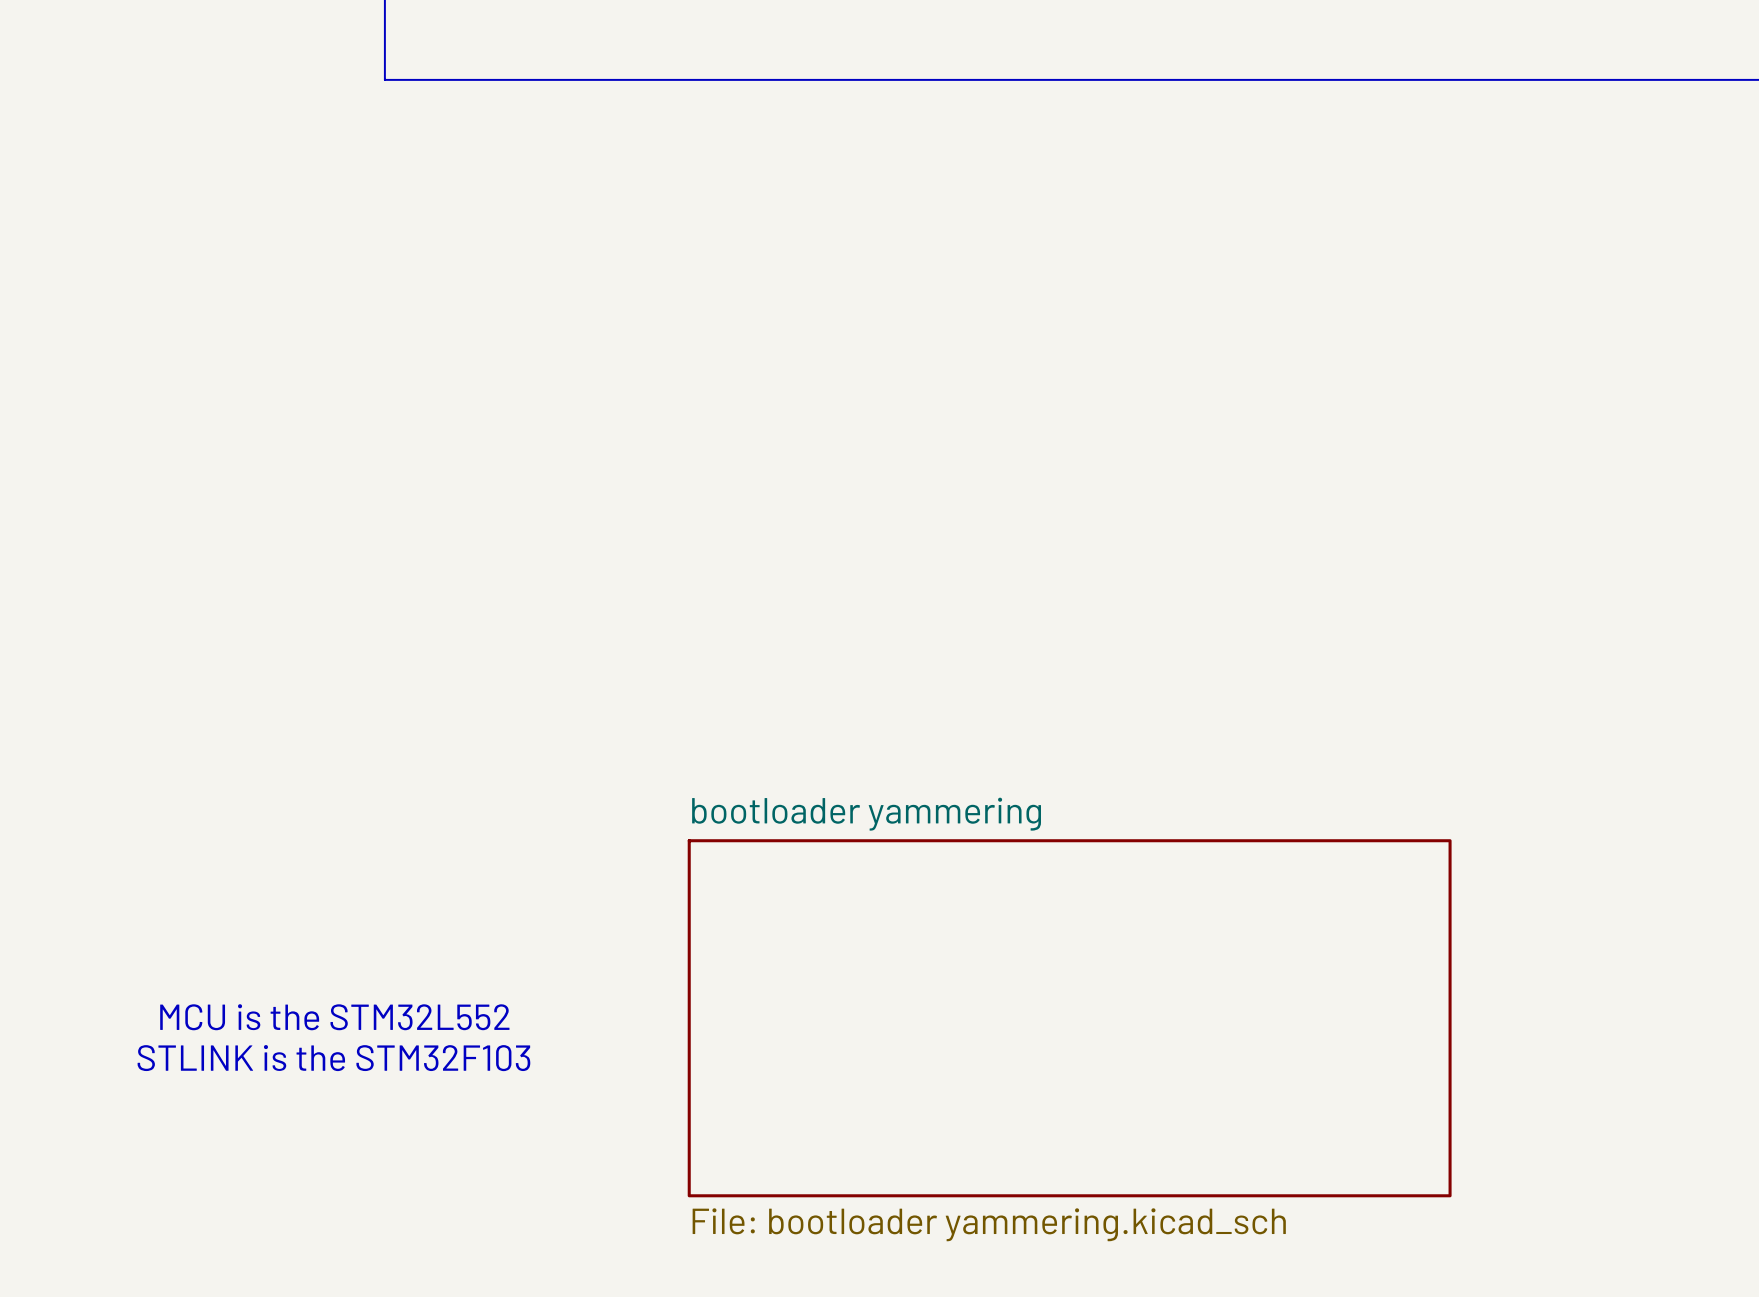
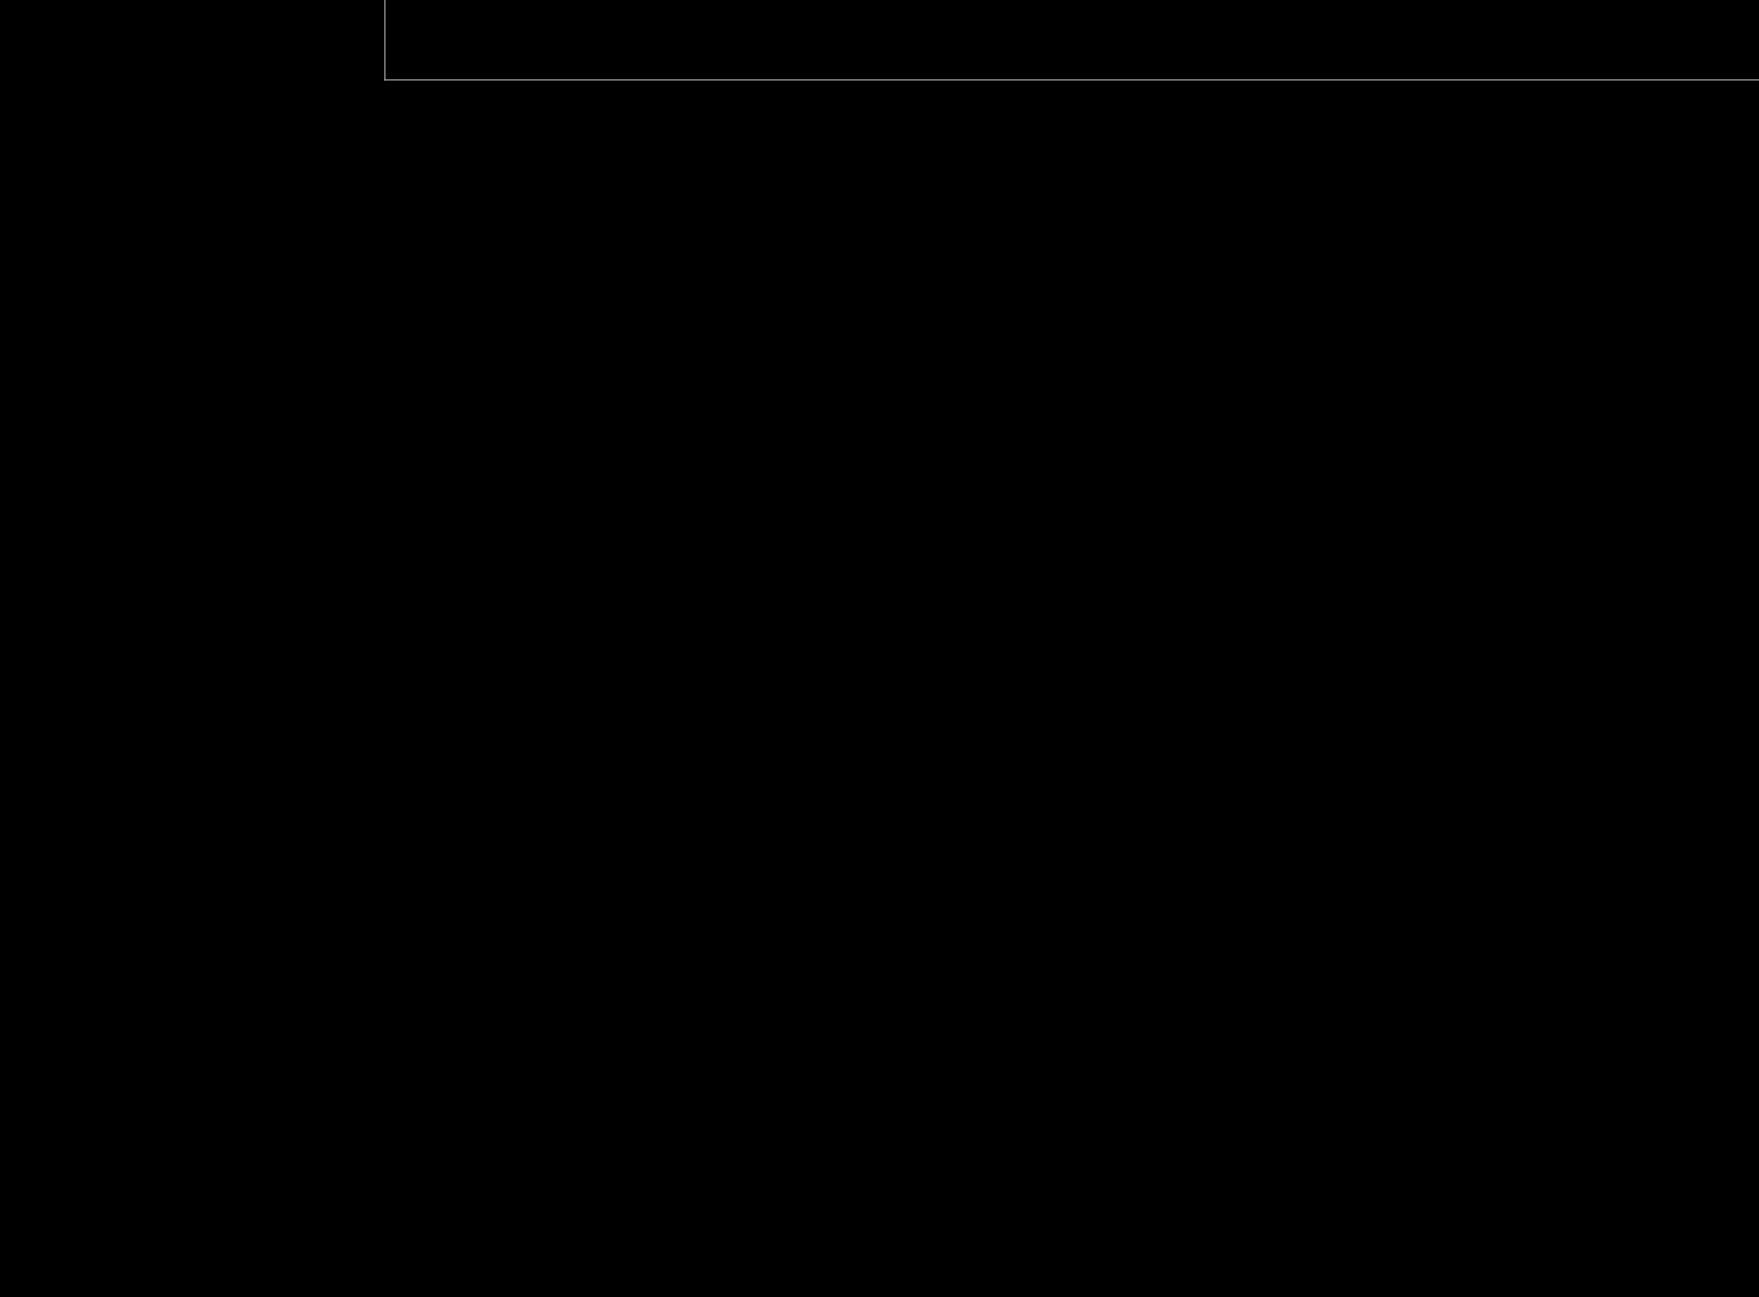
text: MCU is the STM32L552 (334, 1017) -> none
sheet bootloader yammering: File: bootloader yammering.kicad_sch (1069, 1018) -> none
text: STLINK is the STM32F103 (333, 1058) -> none

